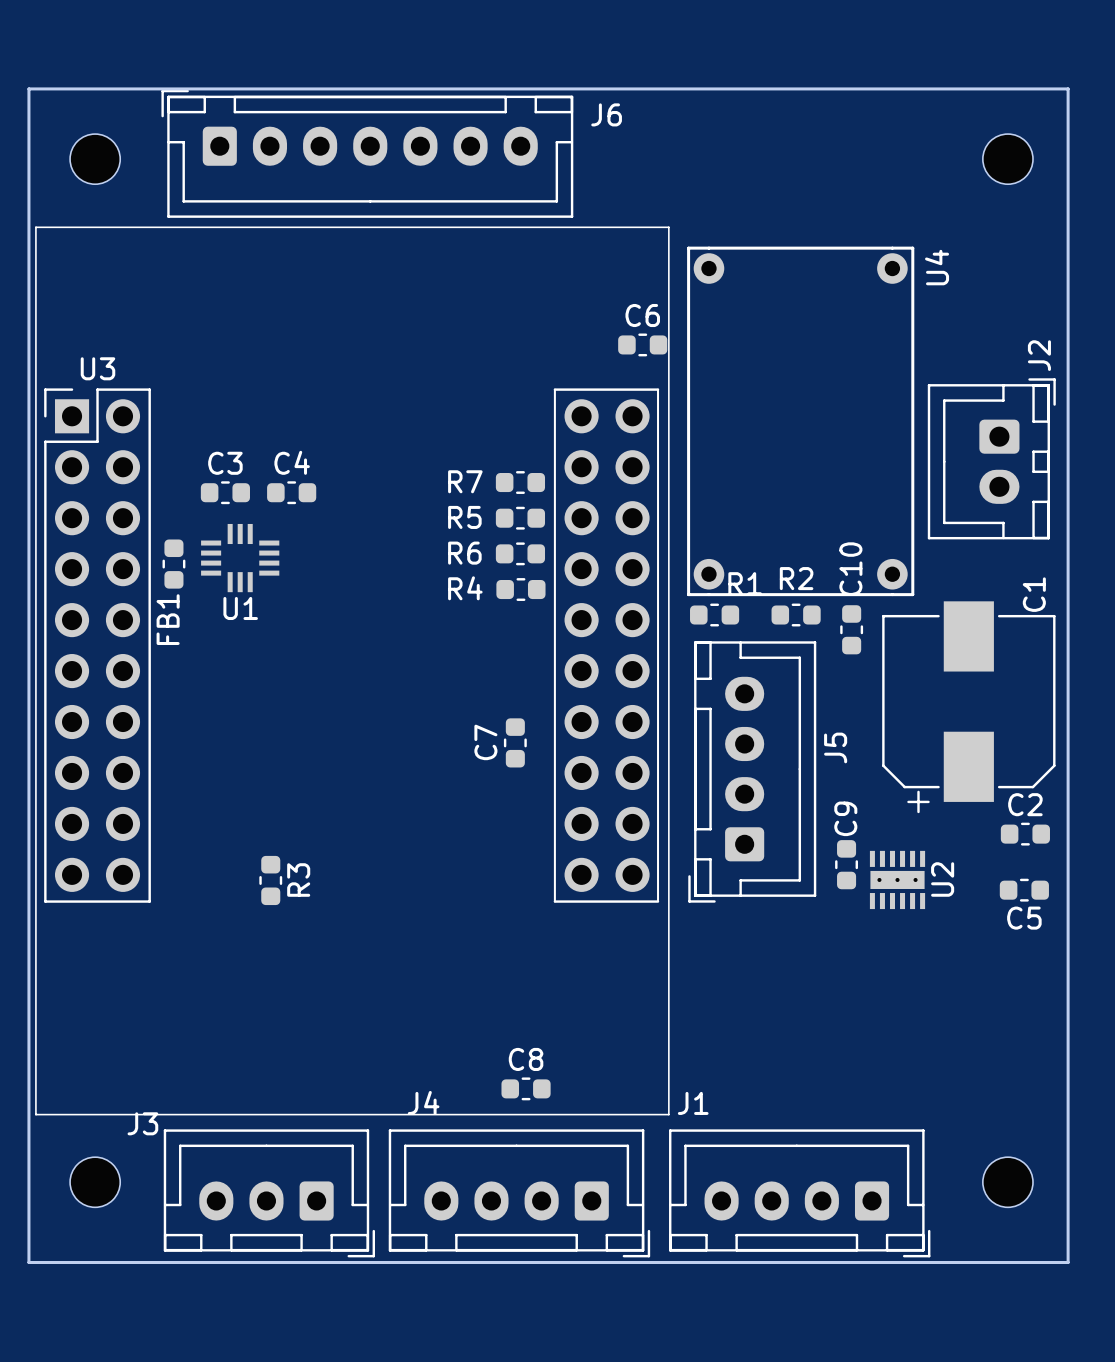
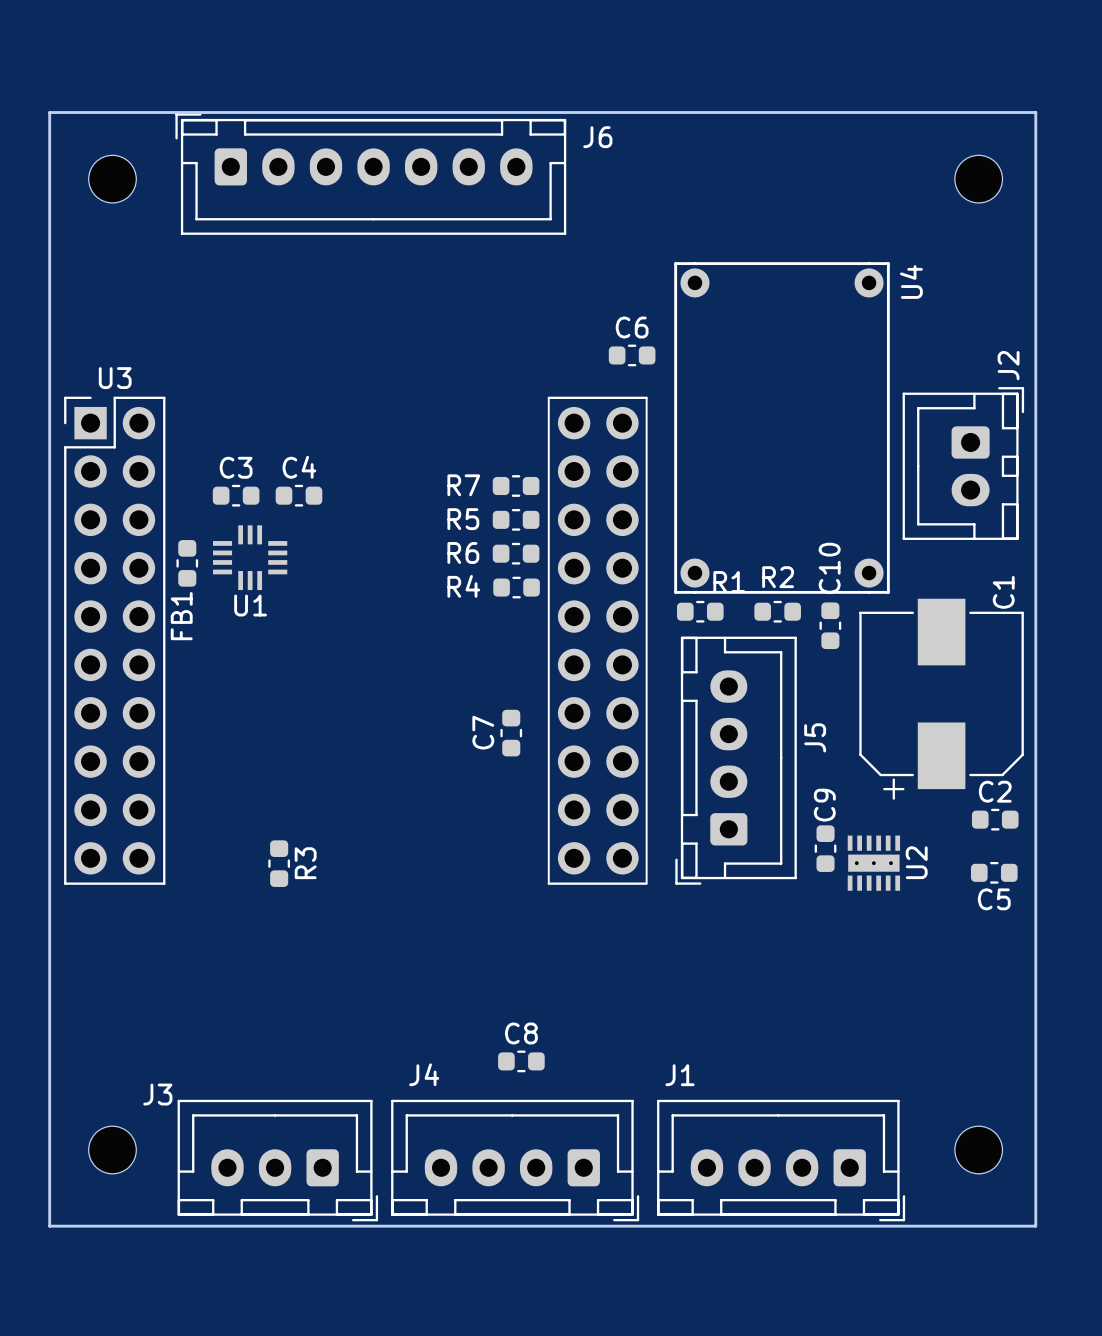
U3 footprint: [35, 226, 670, 1116] -> [64, 396, 648, 885]

